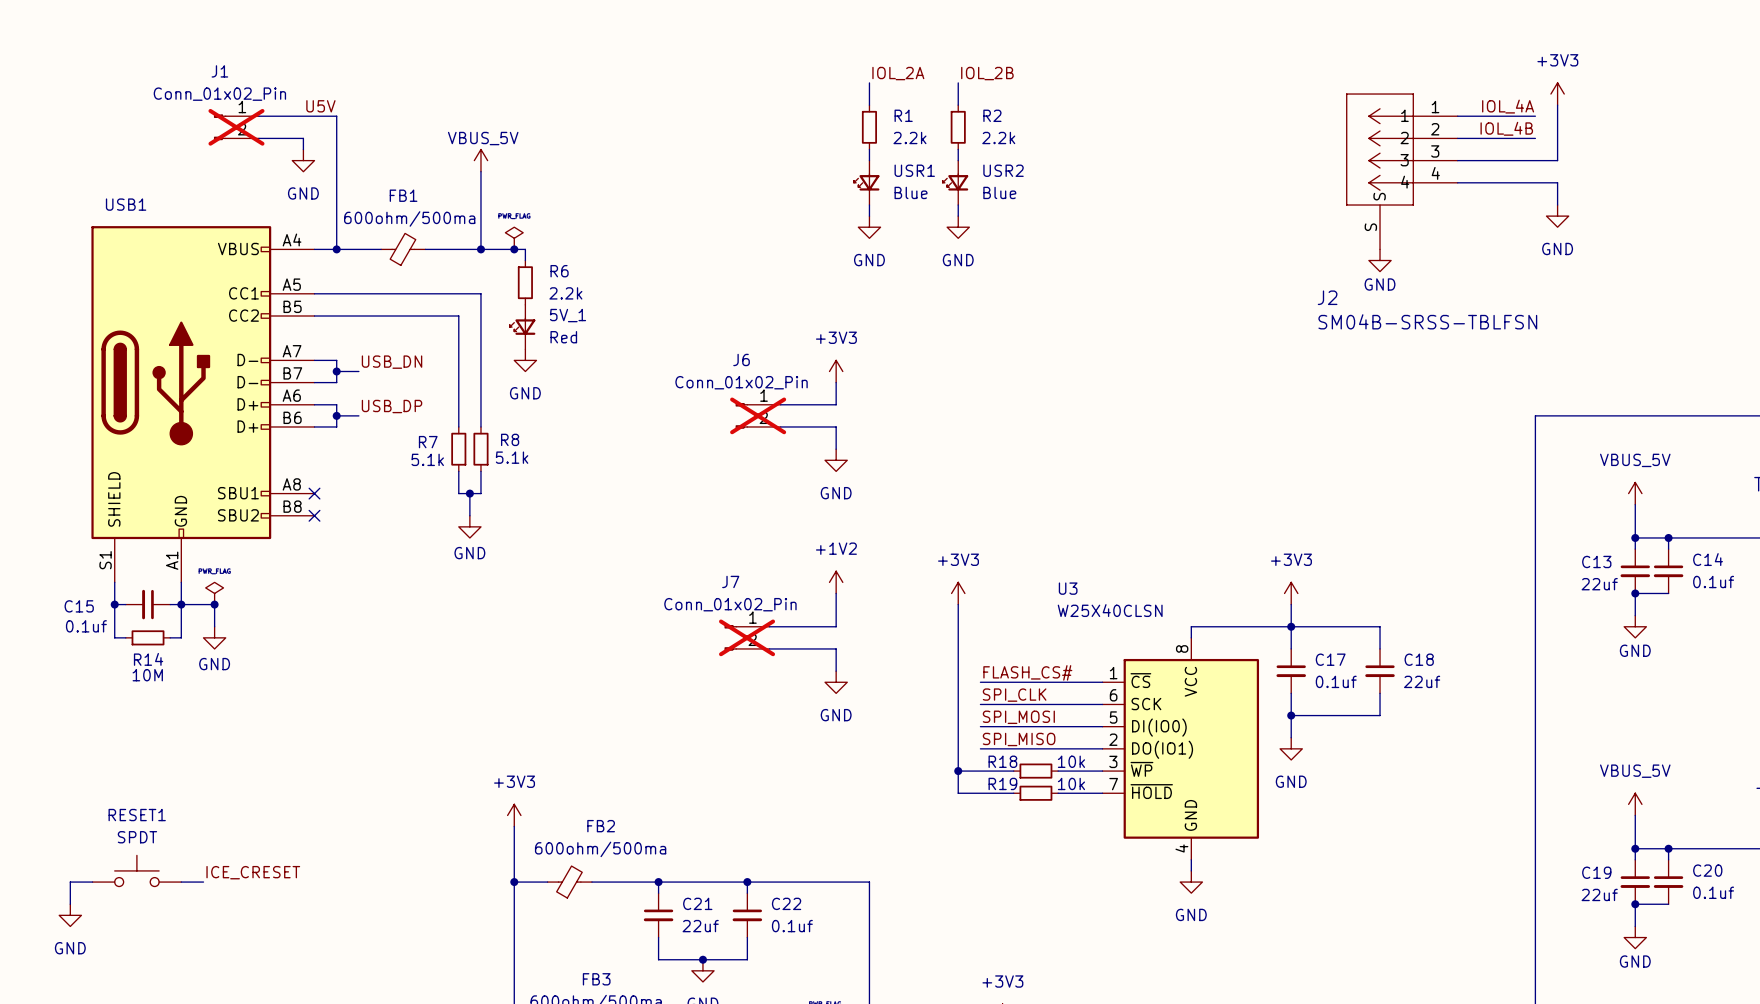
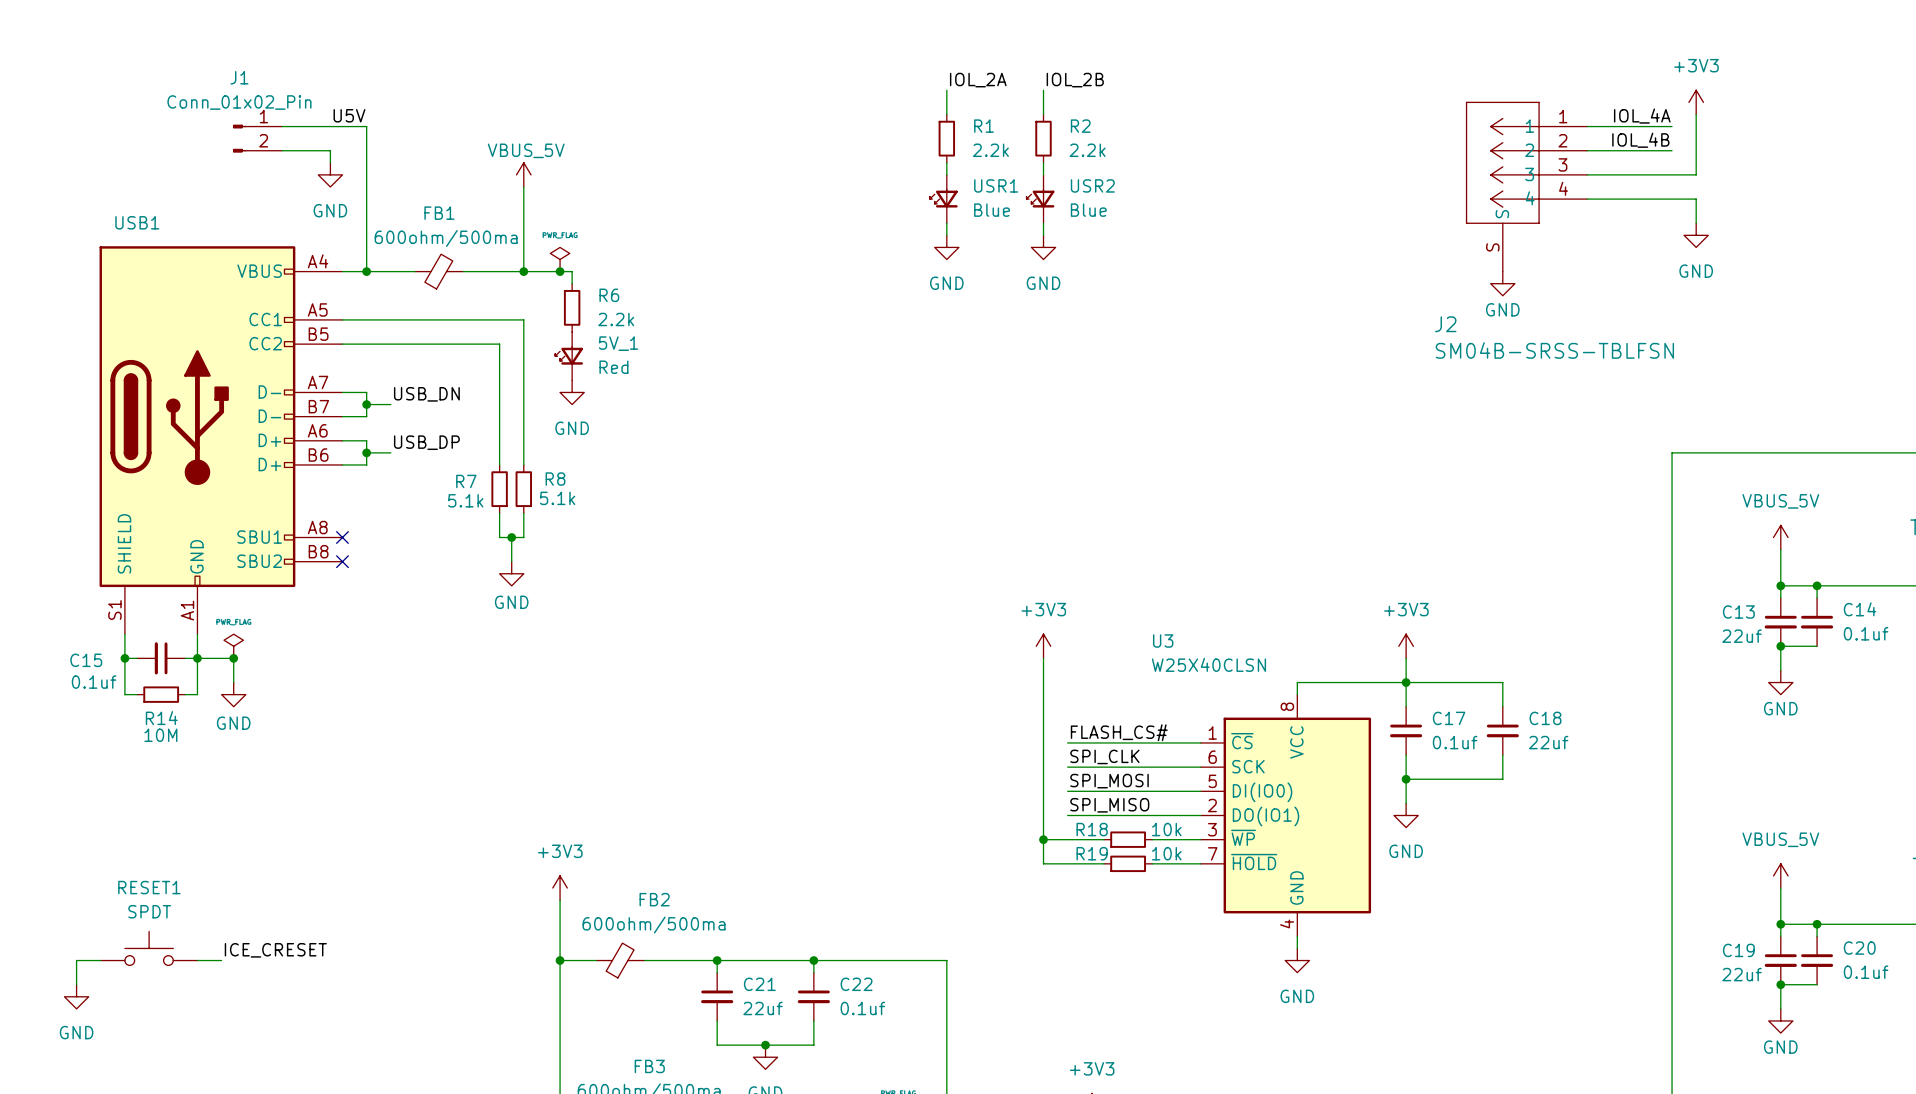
J1 do-not-place cross: (236, 127) -> none
power symbol: +3V3 (836, 371) -> none
wire: (836, 382) (836, 404) (780, 404) -> none
J6: Conn_01x02_Pin (758, 415) -> none
wire: (780, 426) (836, 426) (836, 449) -> none
power symbol: GND (836, 460) -> none
power symbol: +1V2 (836, 582) -> none
wire: (836, 593) (836, 626) (769, 626) -> none
J7: Conn_01x02_Pin (747, 637) -> none
wire: (769, 648) (836, 648) (836, 671) -> none
power symbol: GND (836, 682) -> none

